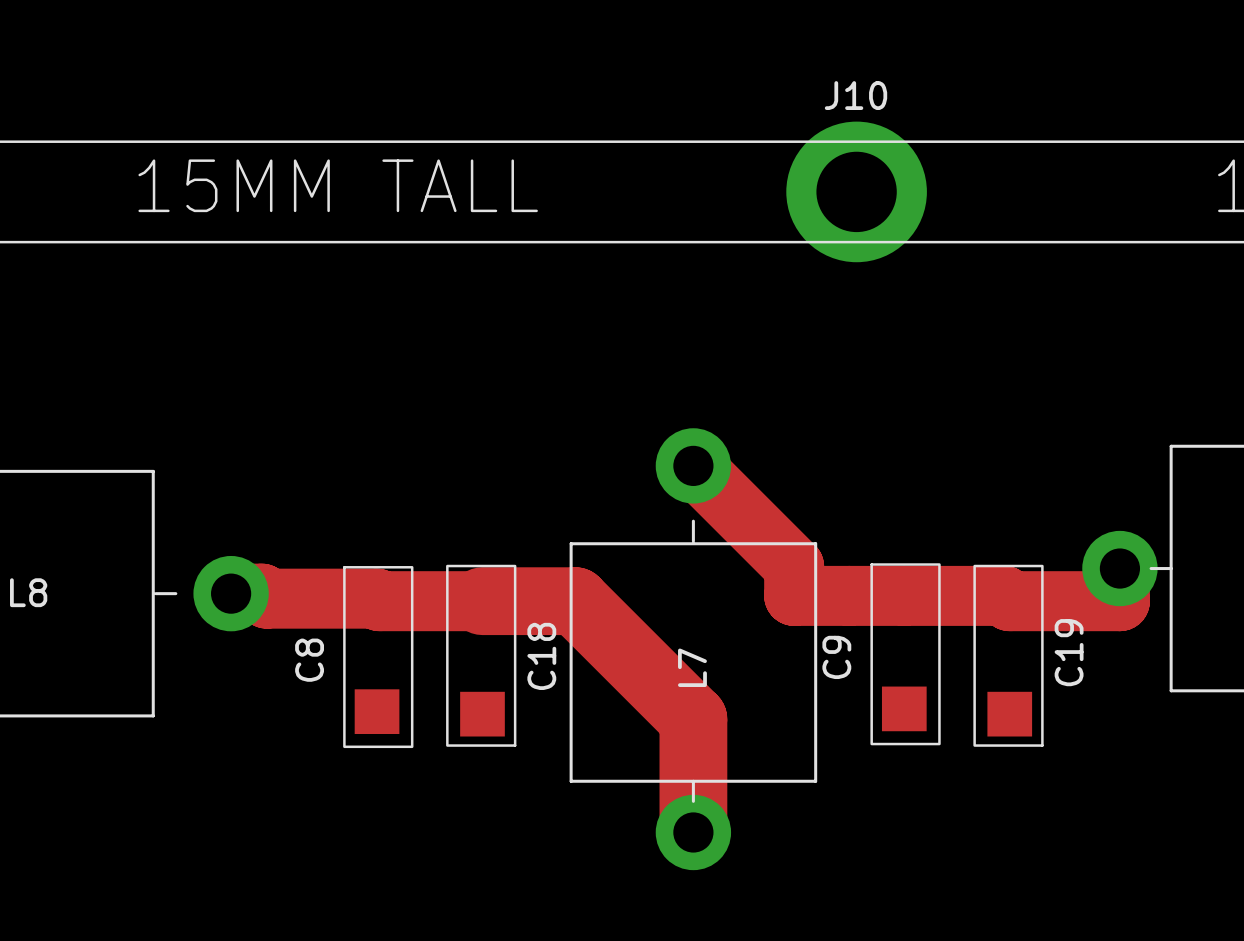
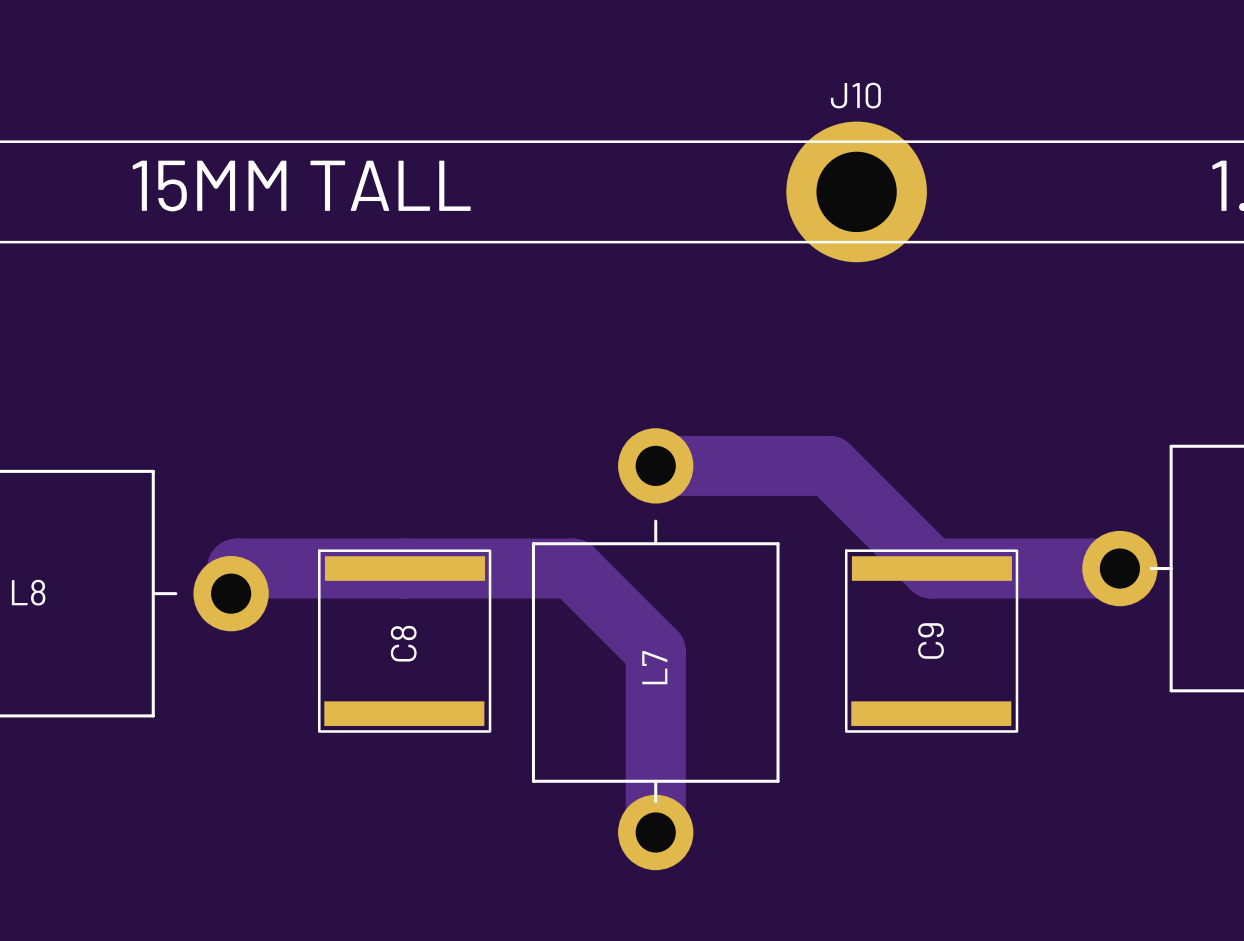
track: (693, 465) (794, 566) (794, 595) (1004, 595) (1009, 601) (1119, 601) (1119, 568) -> (655, 465) (829, 465) (931, 568) (1119, 568)
C9 footprint: [870, 563, 941, 746] -> [844, 549, 1019, 733]
C8 footprint: [343, 566, 414, 749] -> [318, 549, 492, 733]
track: (231, 593) (261, 593) (266, 598) (377, 598) (379, 601) (575, 601) (693, 719) (693, 832) -> (231, 593) (237, 587) (237, 568) (572, 568) (655, 651) (655, 832)
L7 position: (693, 649) -> (655, 649)
C18: (481, 655) -> none
C19: (1008, 655) -> none
C9 name position: C9 (836, 657) -> C9 (931, 640)
C8 name position: C8 (309, 660) -> C8 (403, 643)

